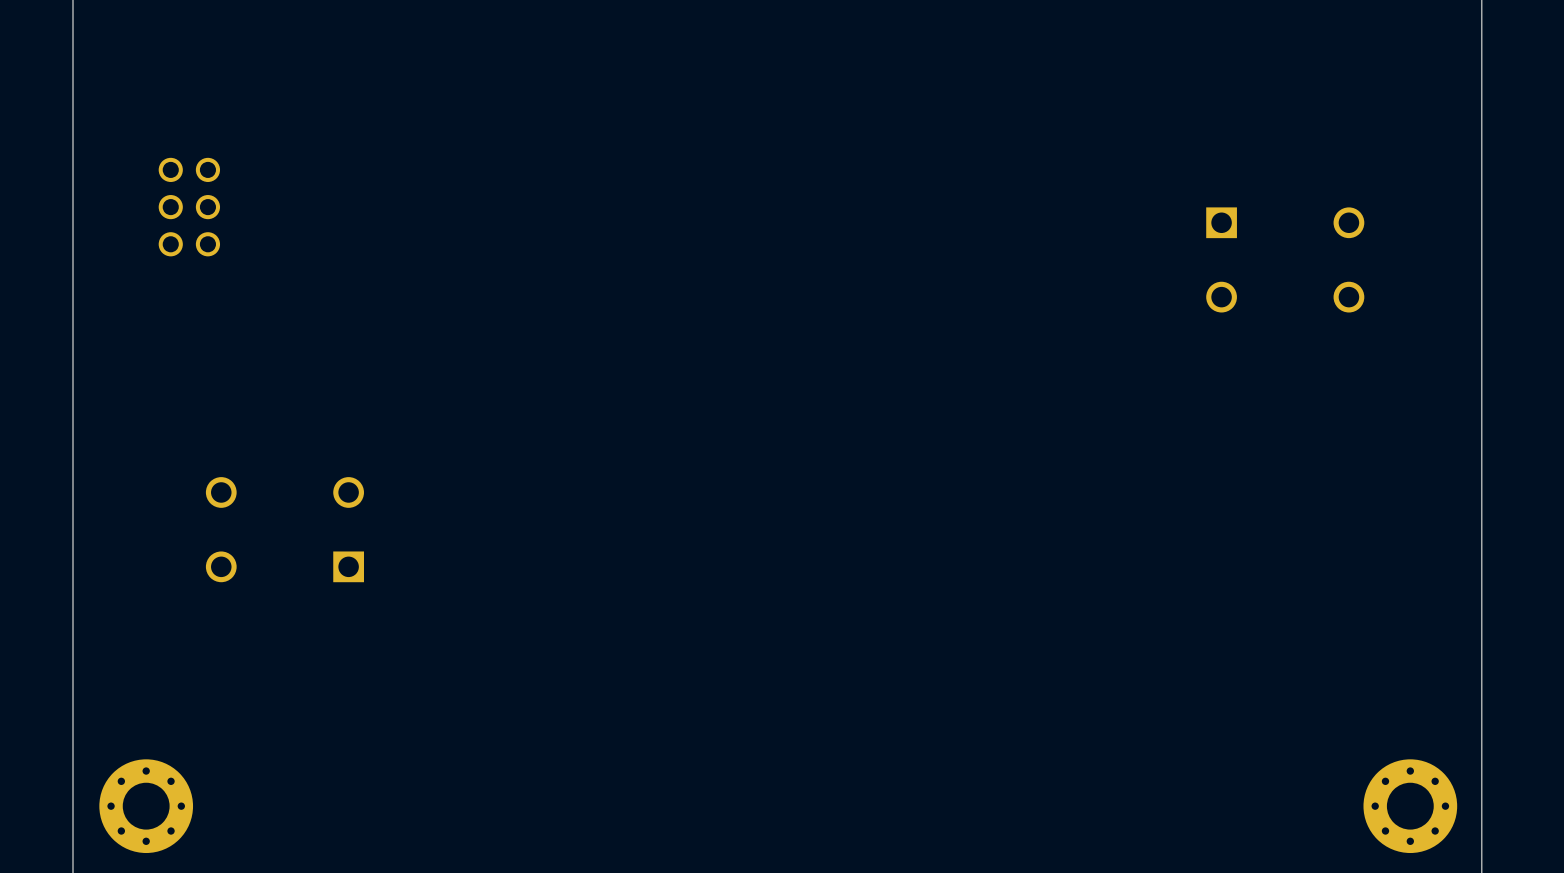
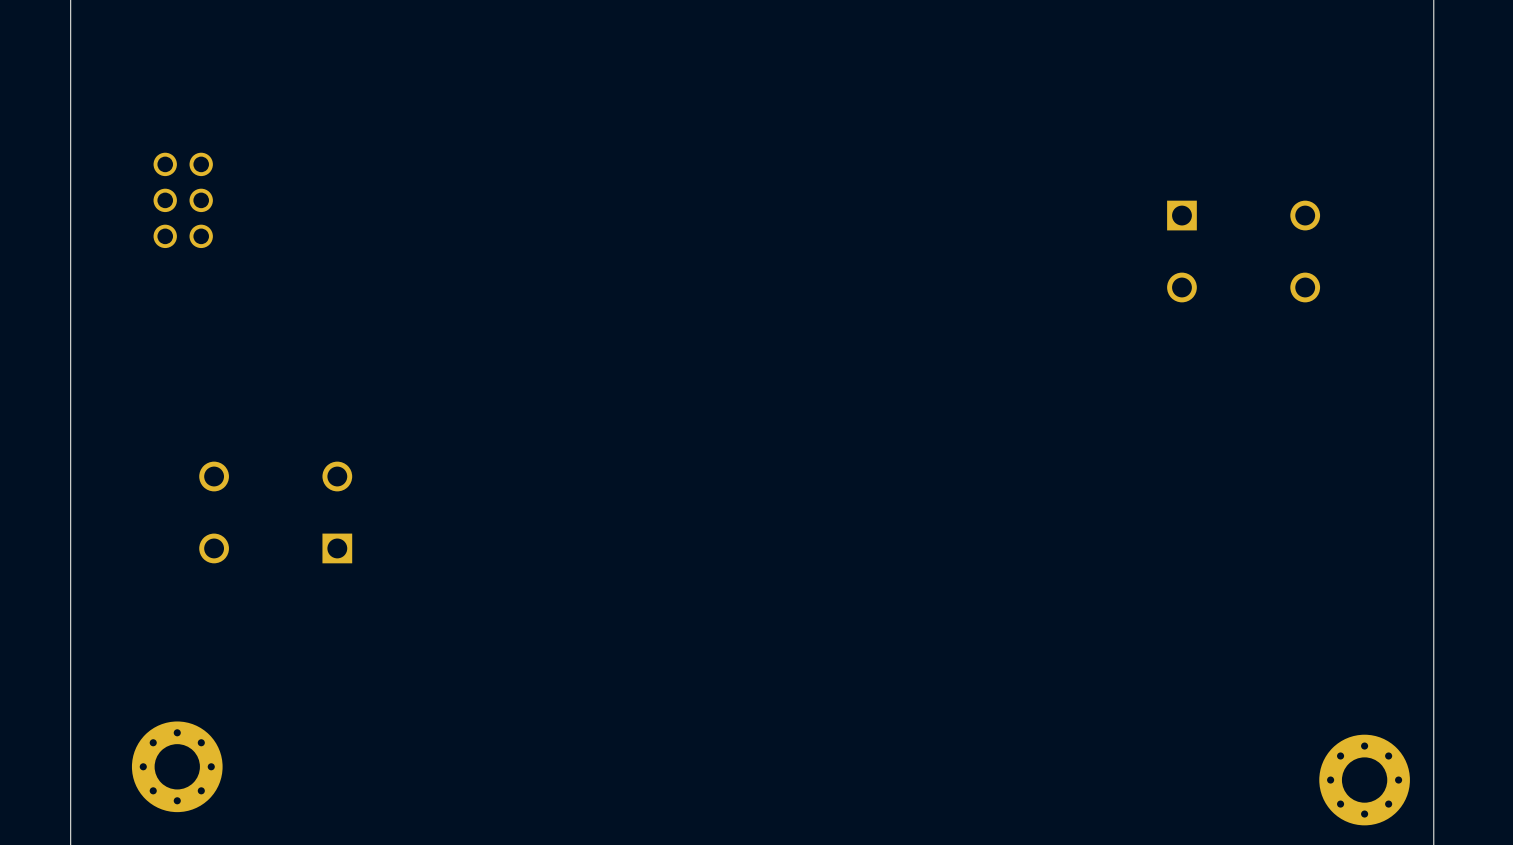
part position: (146, 806) -> (177, 766)

